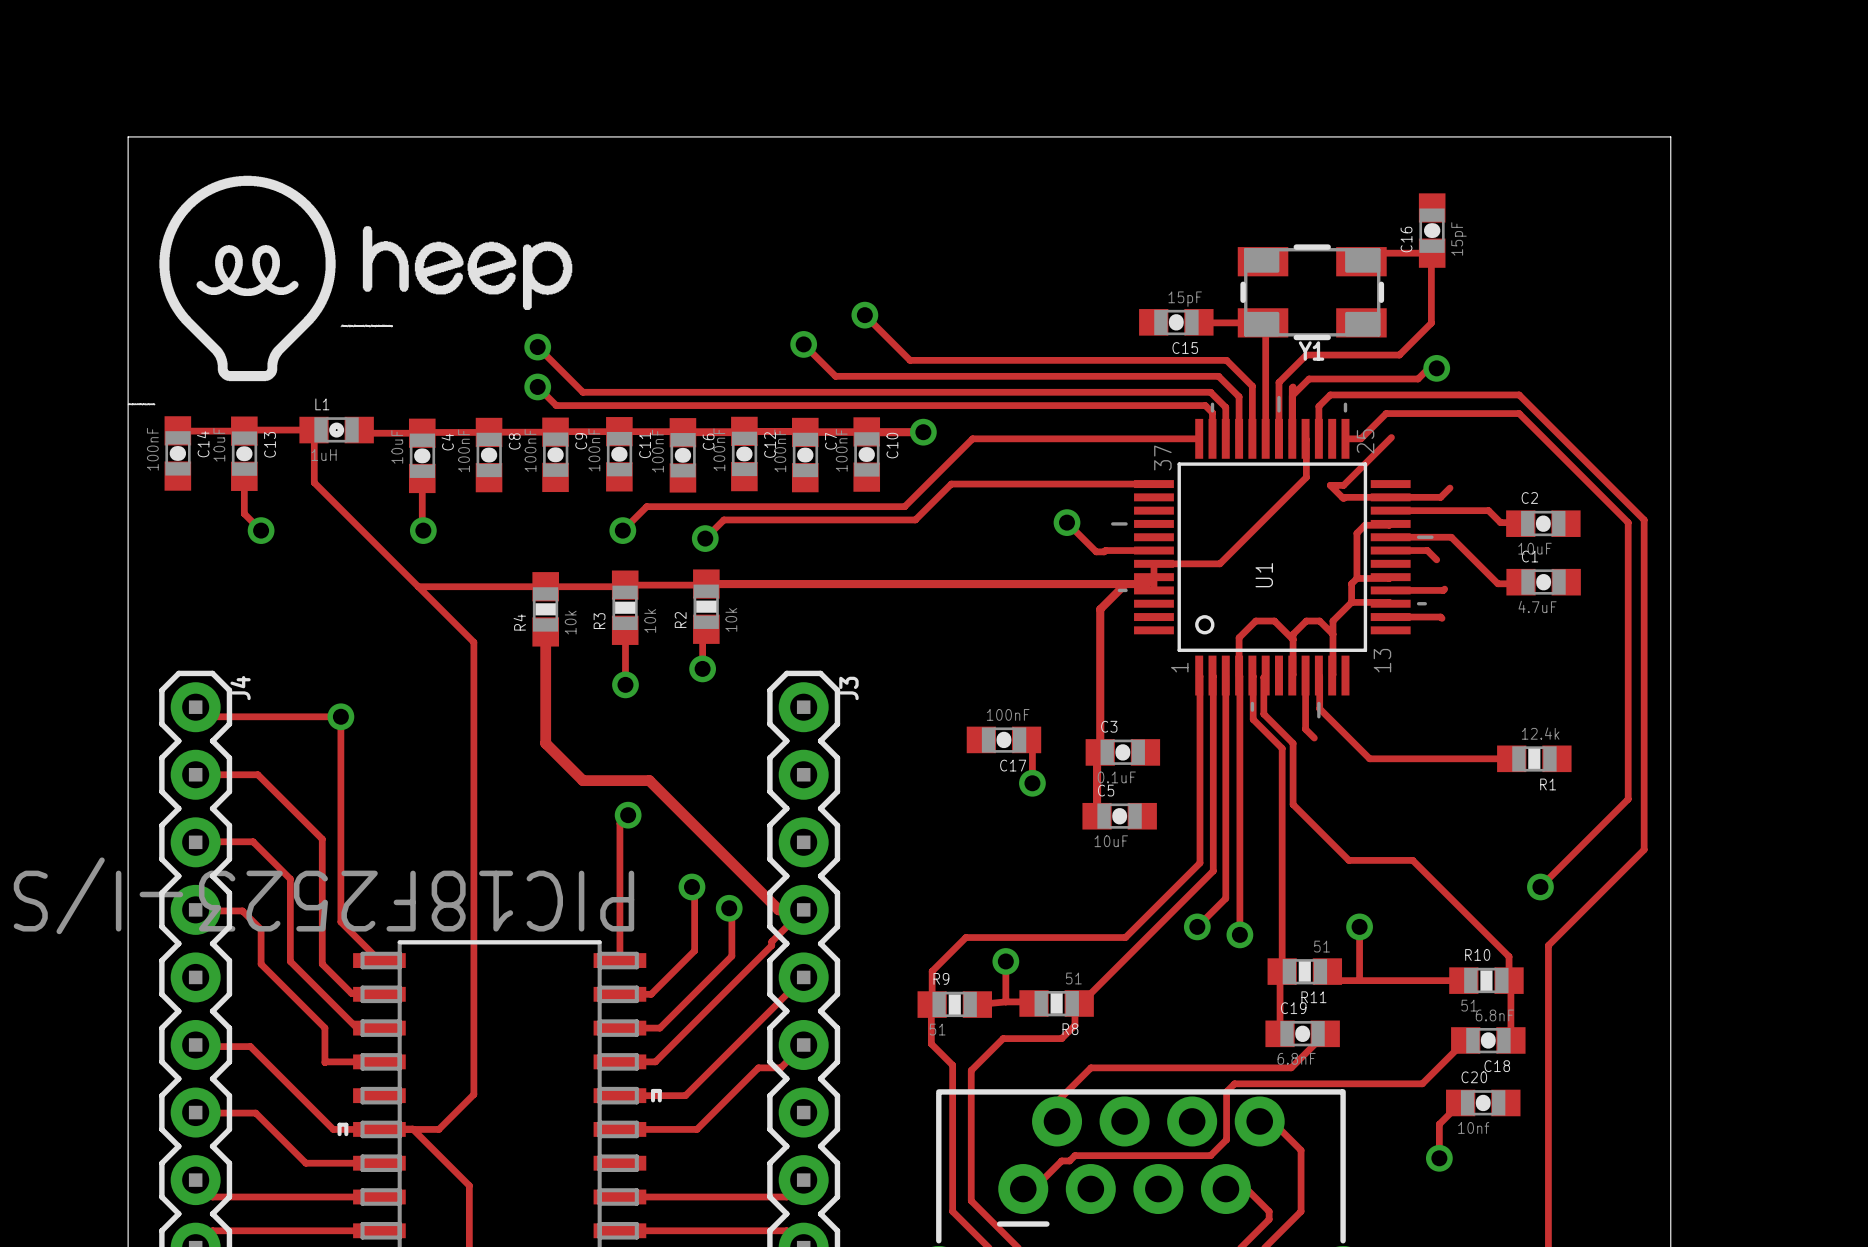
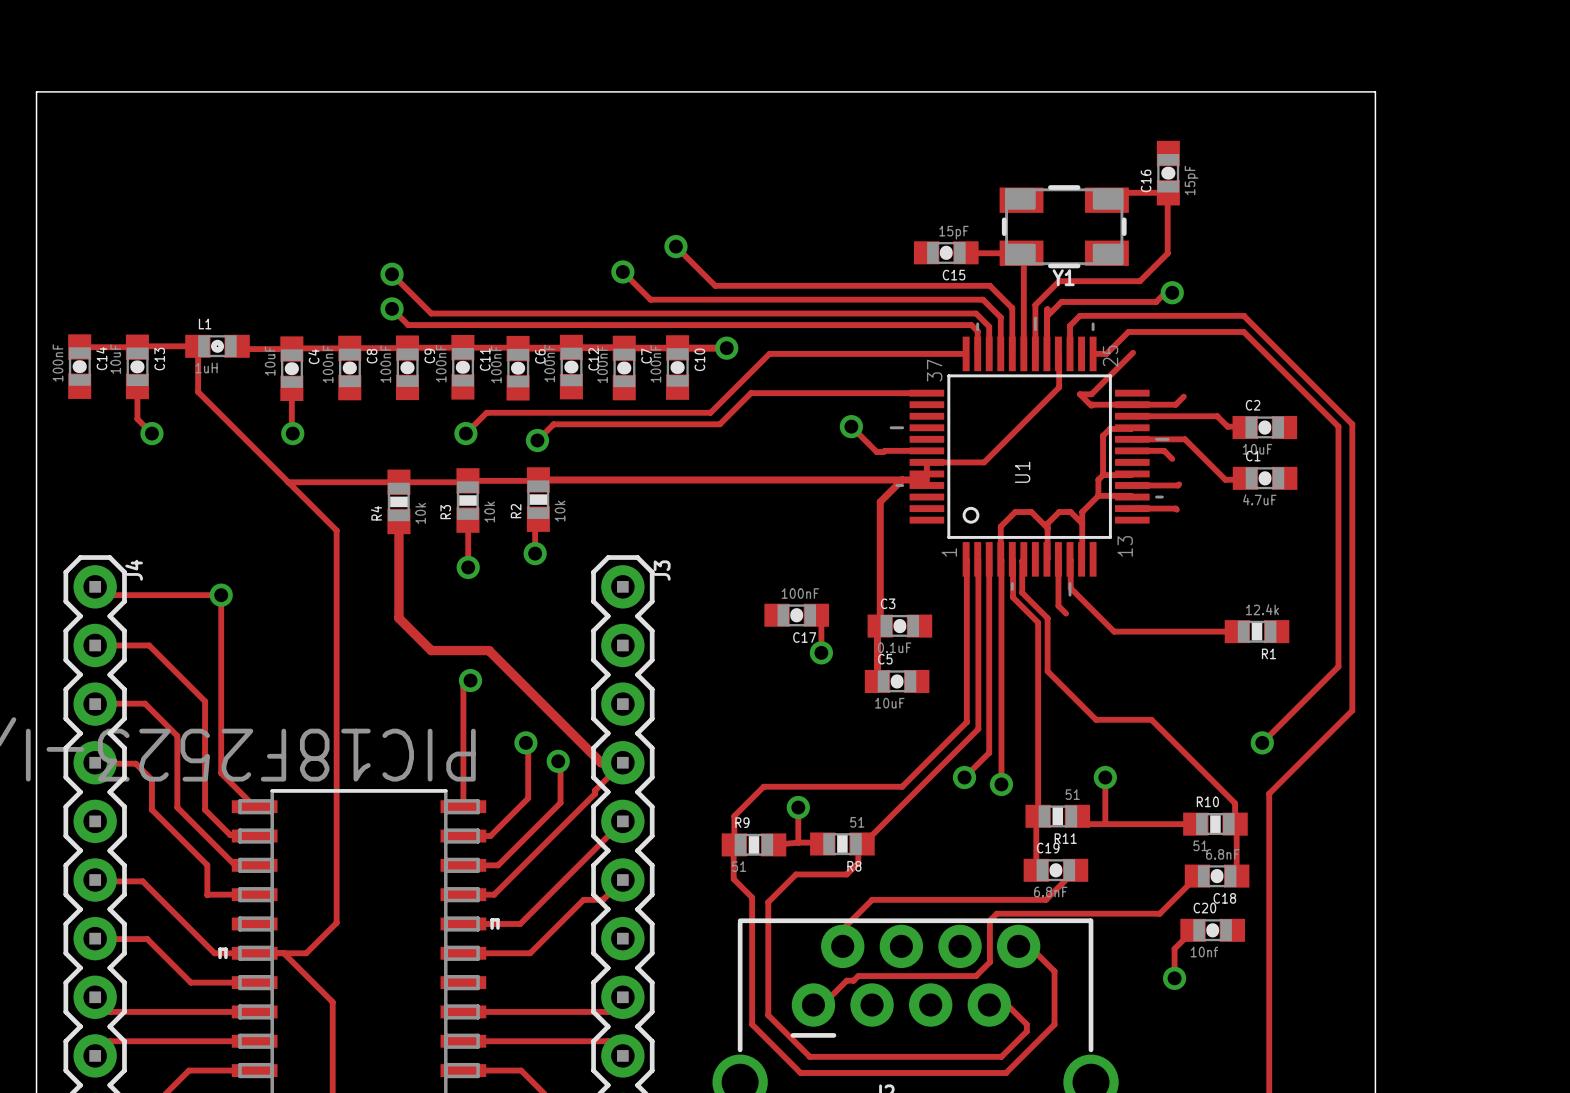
drawing: [159, 175, 573, 382] -> none

